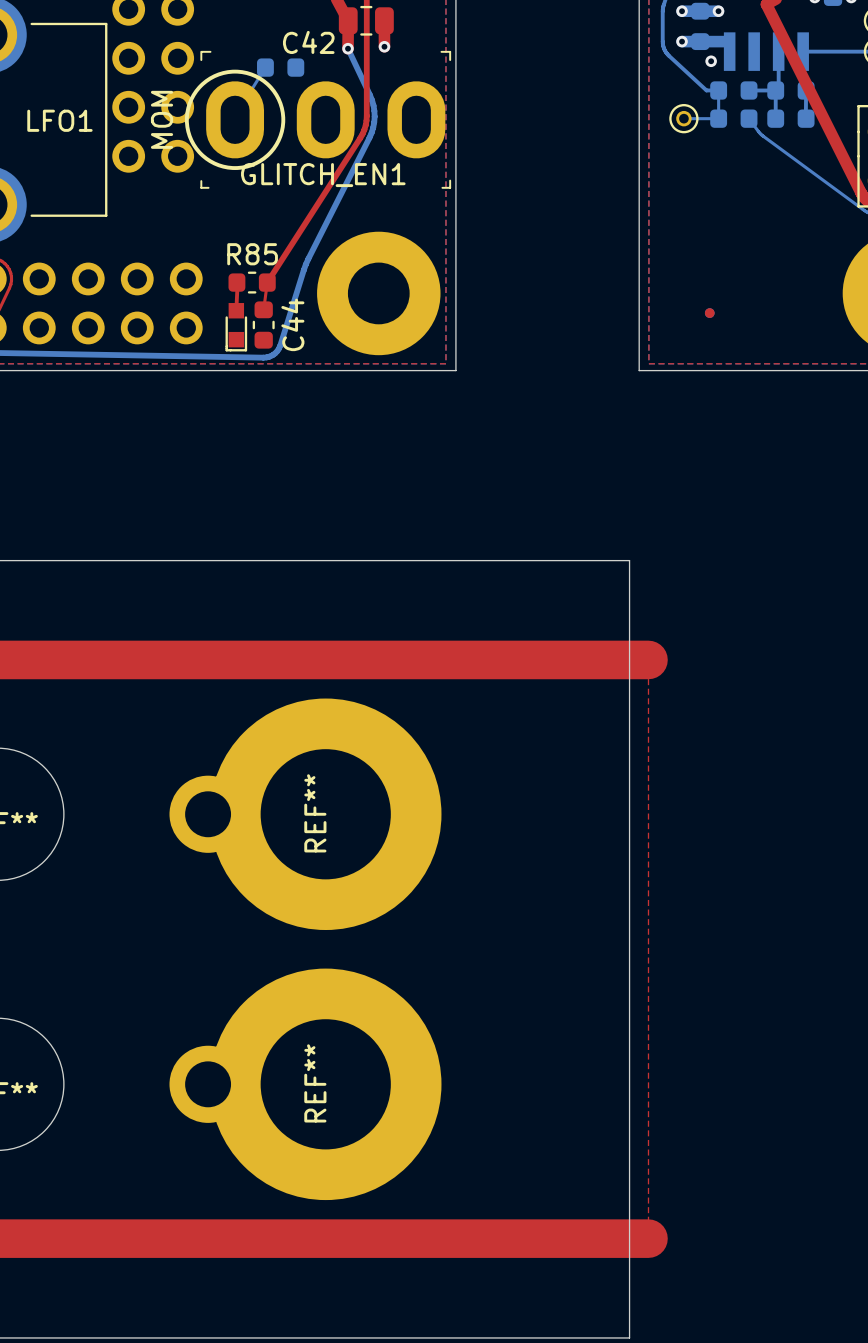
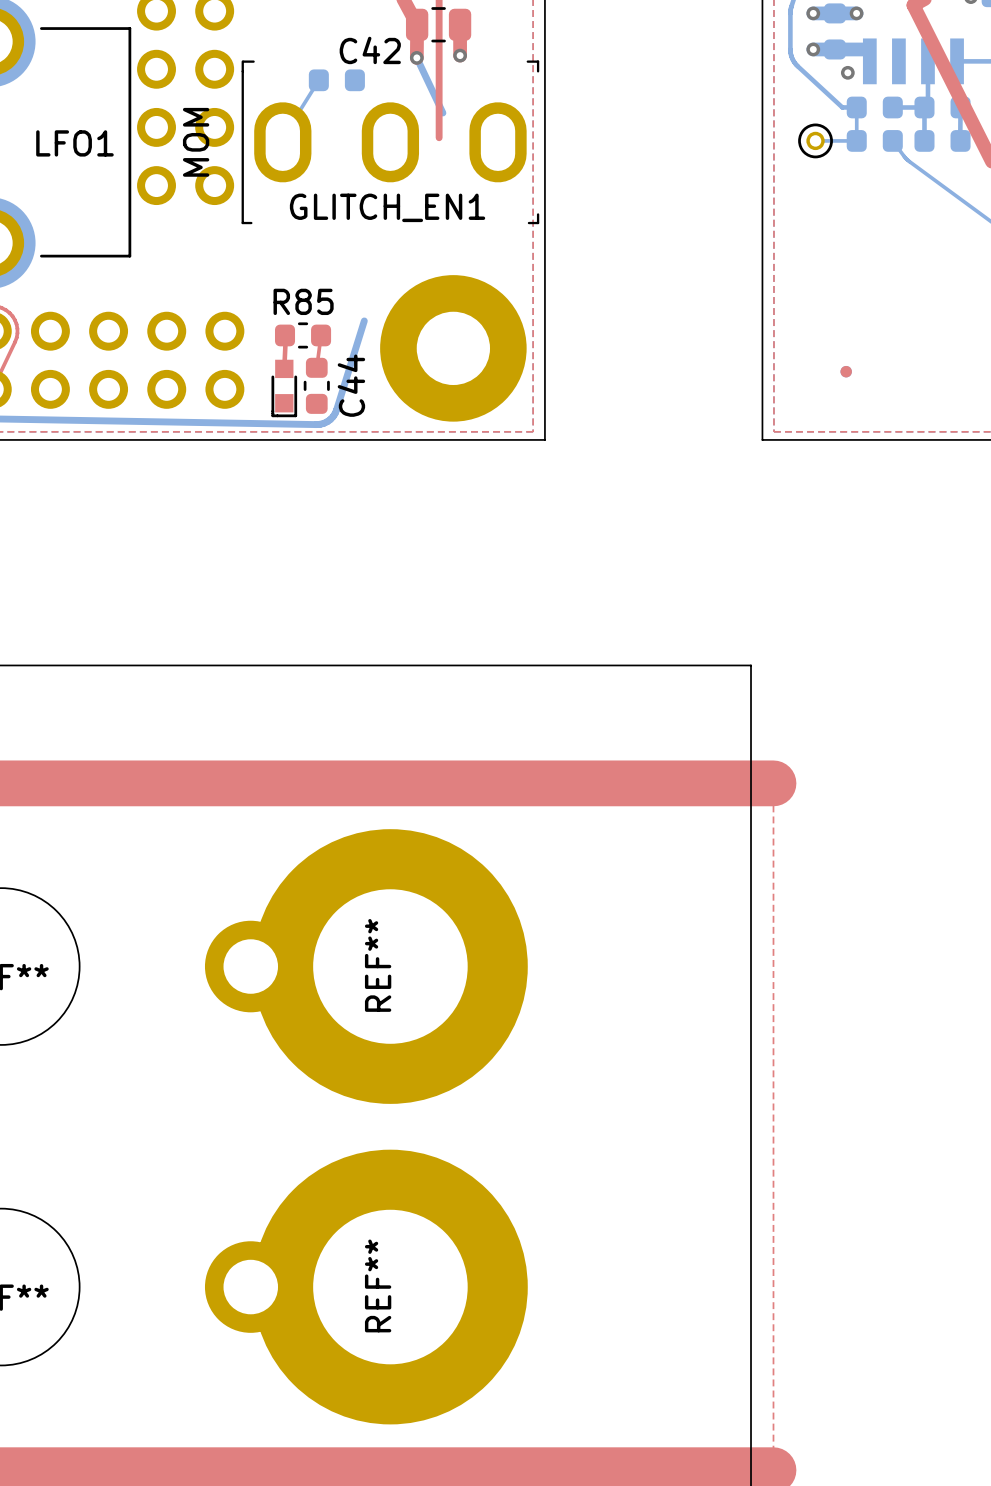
GLITCH_EN1 footprint: [184, 50, 452, 189] -> [241, 60, 540, 225]
bottom track: (369, 95) (374, 111) (371, 132) (303, 270) -> none
top track: (366, 115) (364, 129) (360, 138) (267, 282) -> none

